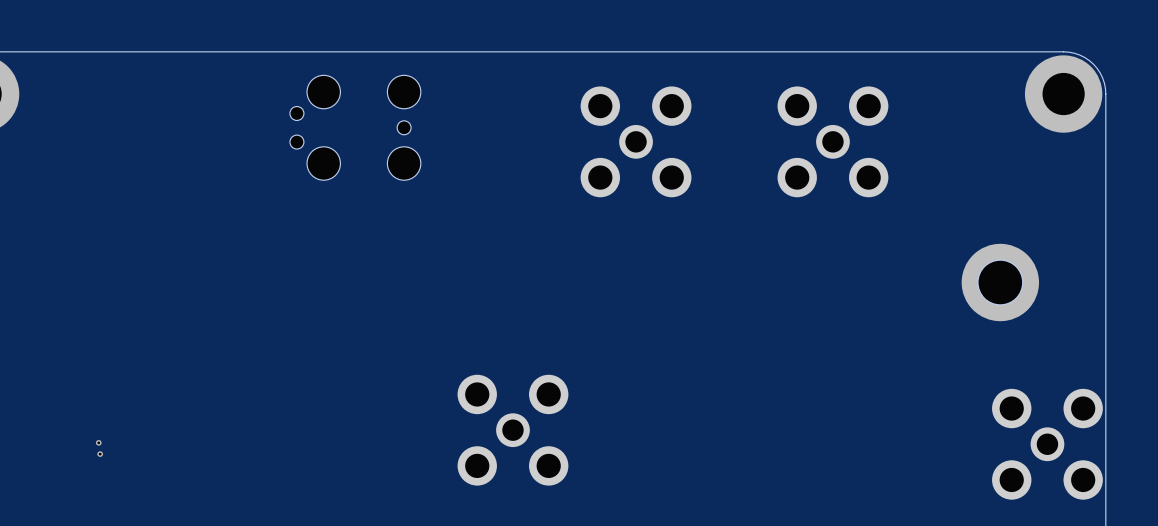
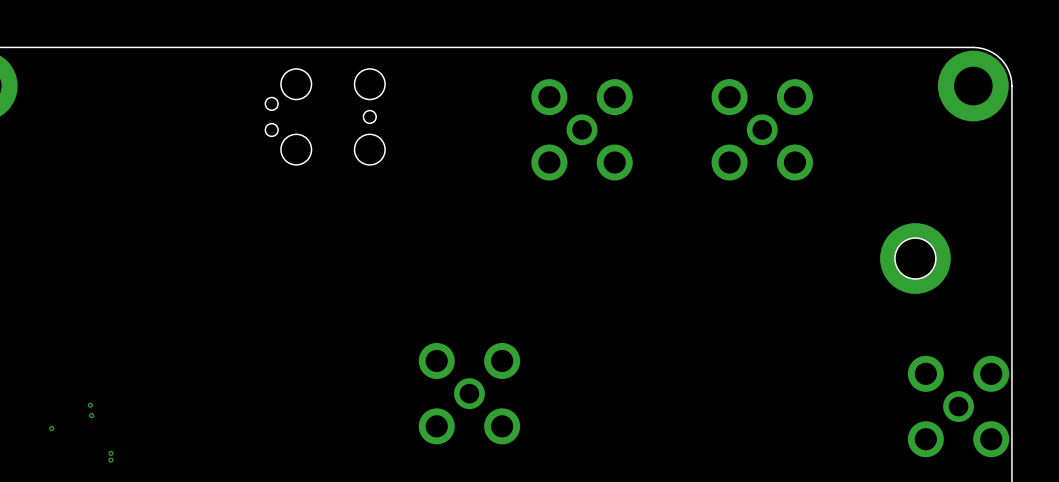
via: none -> (51, 428)
via: none -> (110, 453)
via: none -> (110, 460)

